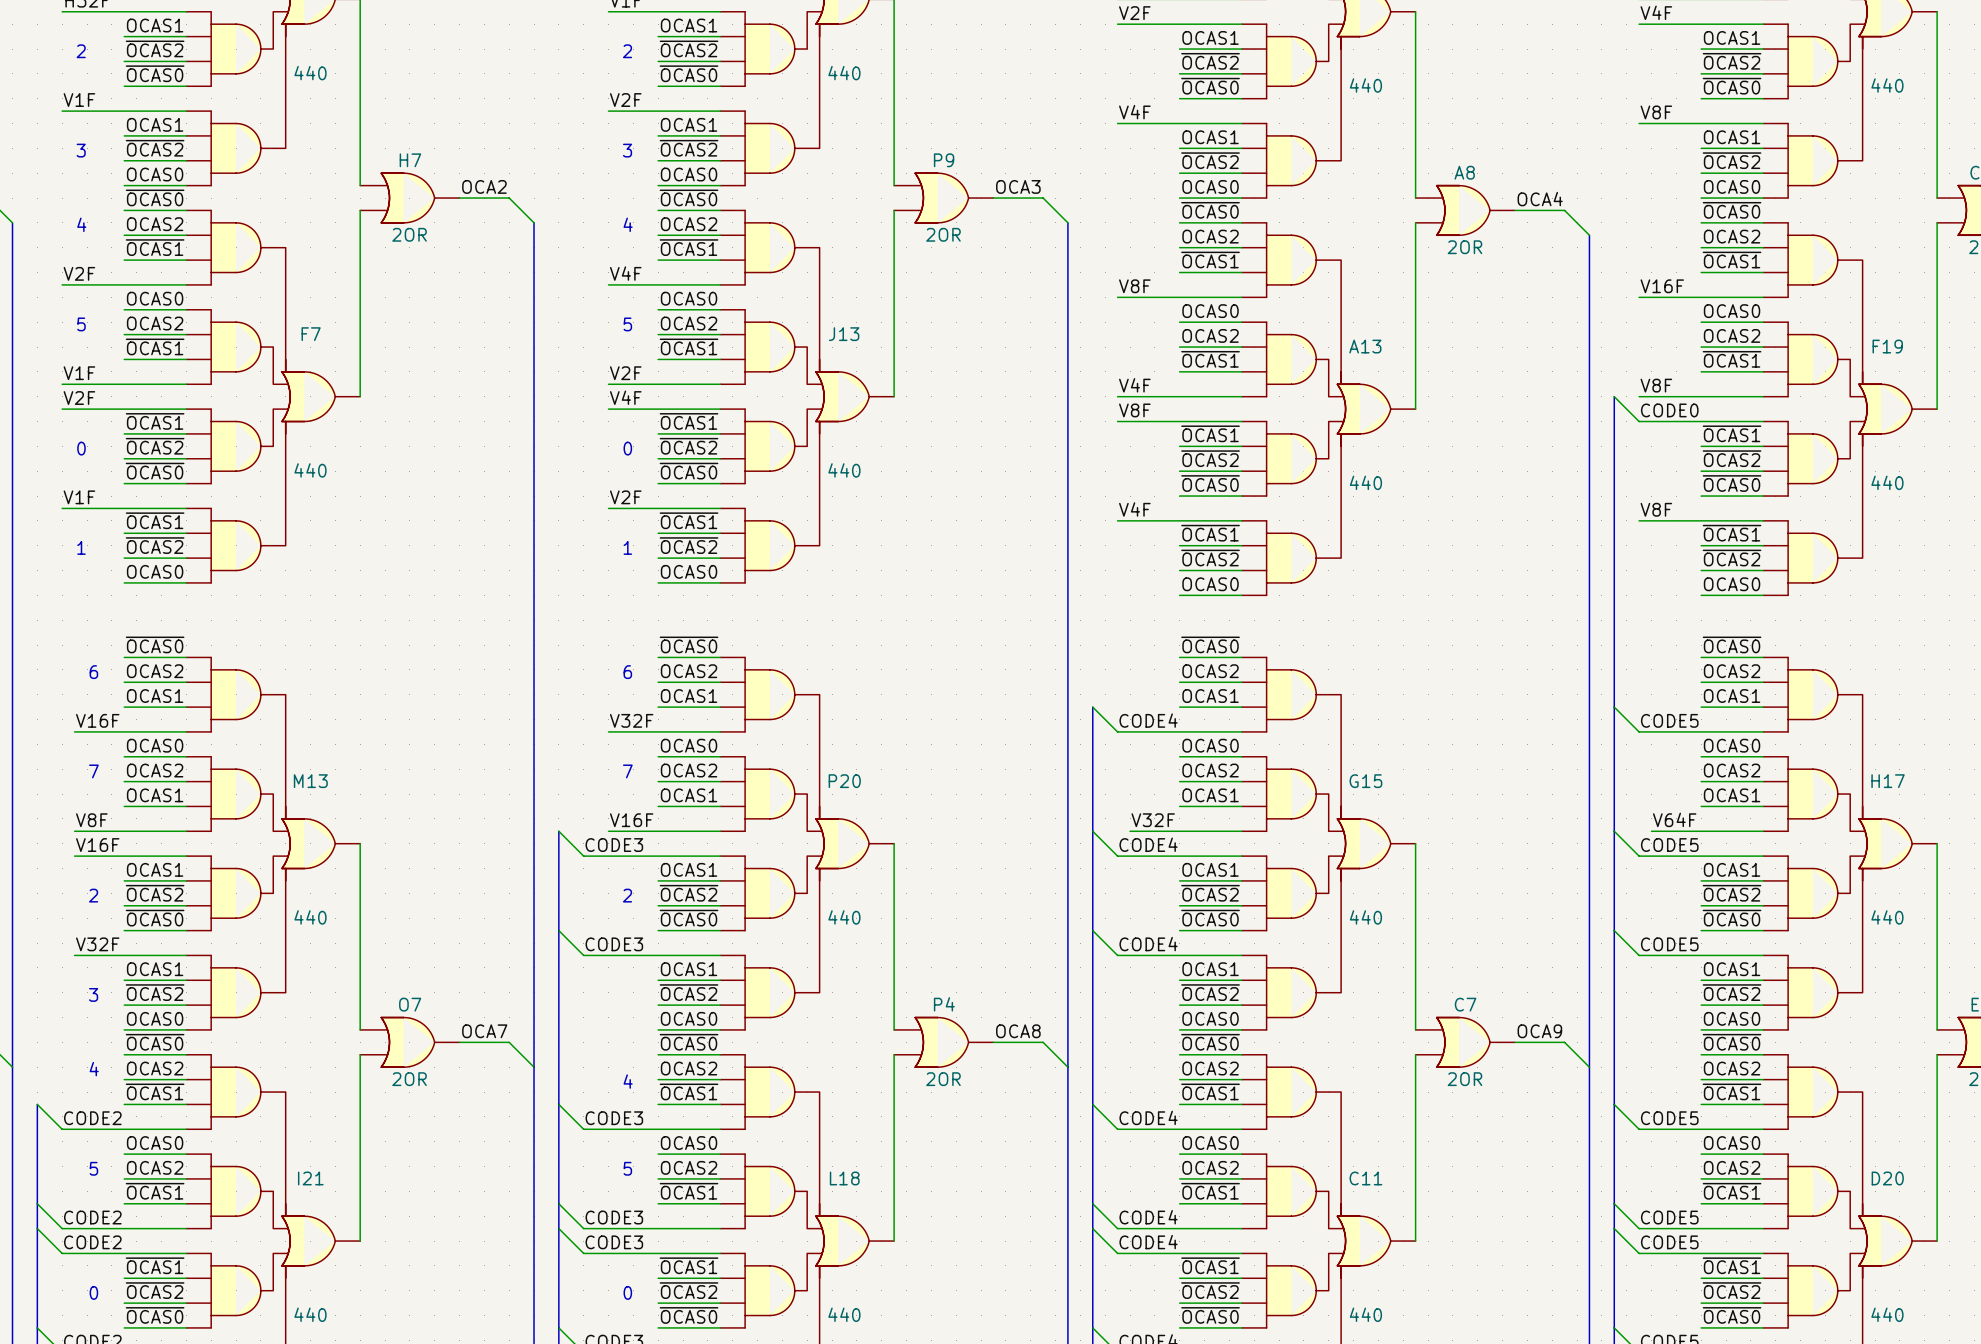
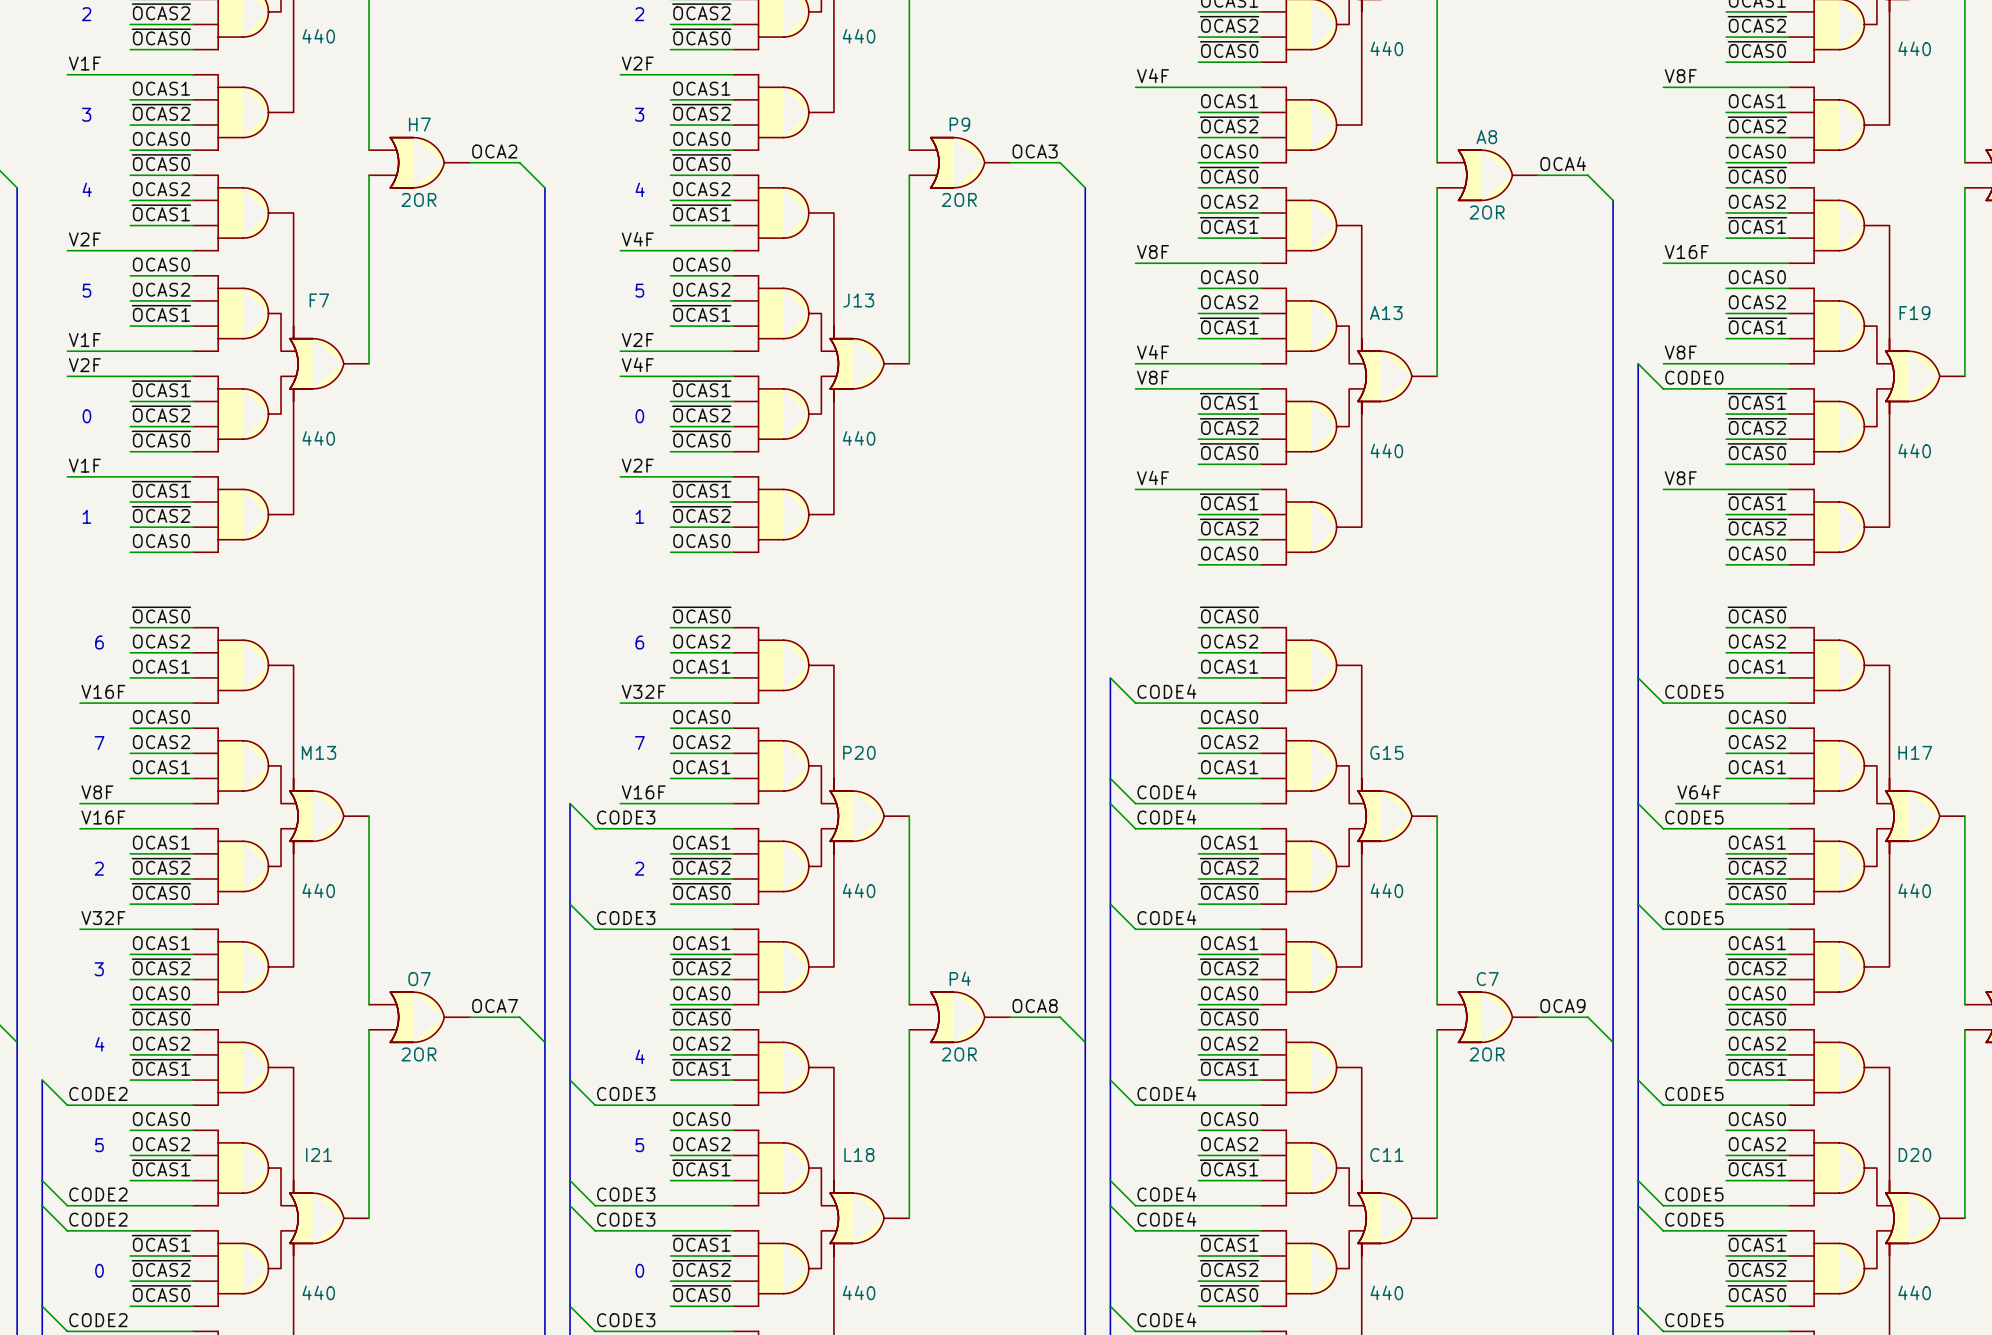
wire: none -> (1110, 778) (1135, 803) (1148, 803)
label: none -> CODE4 (1166, 792)
label: V32F (1153, 820) -> none

